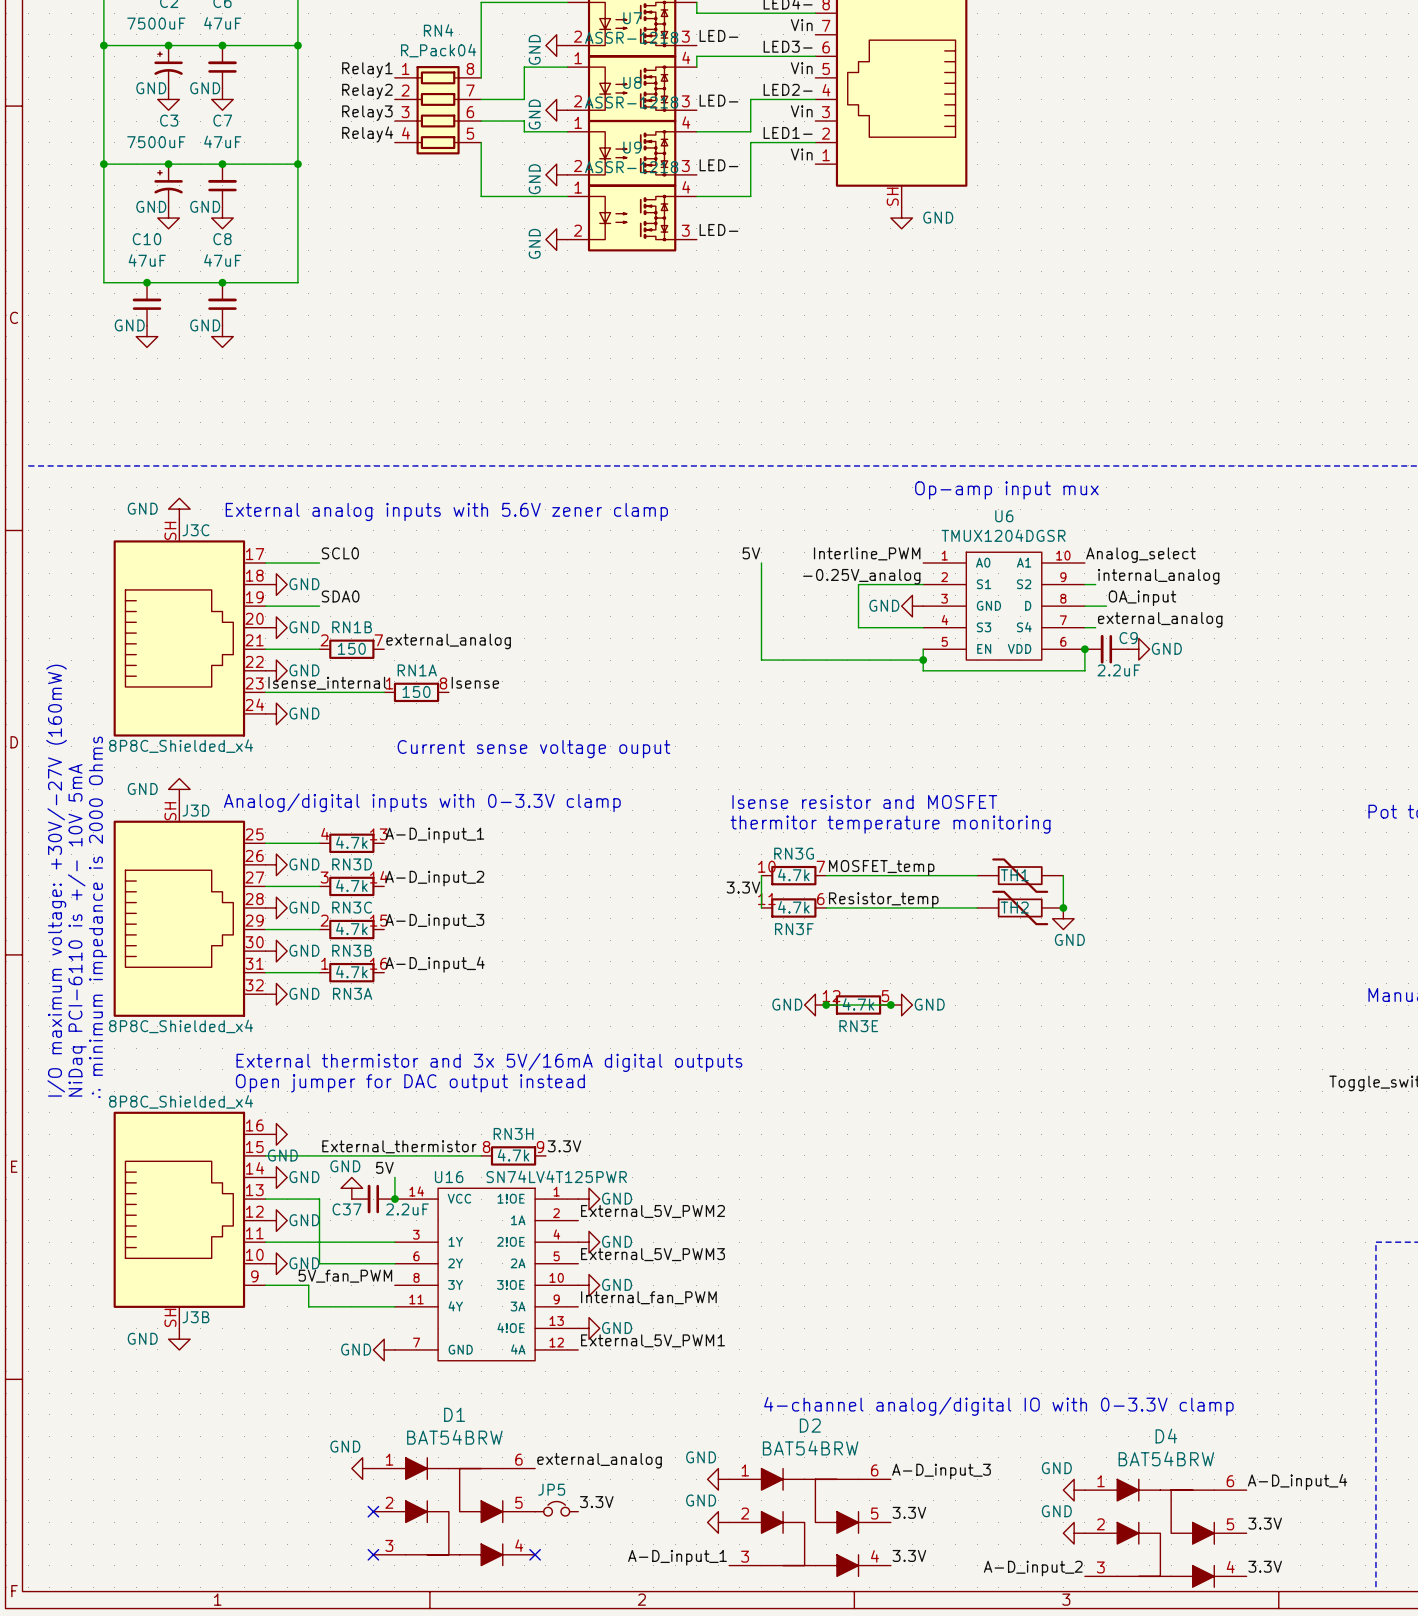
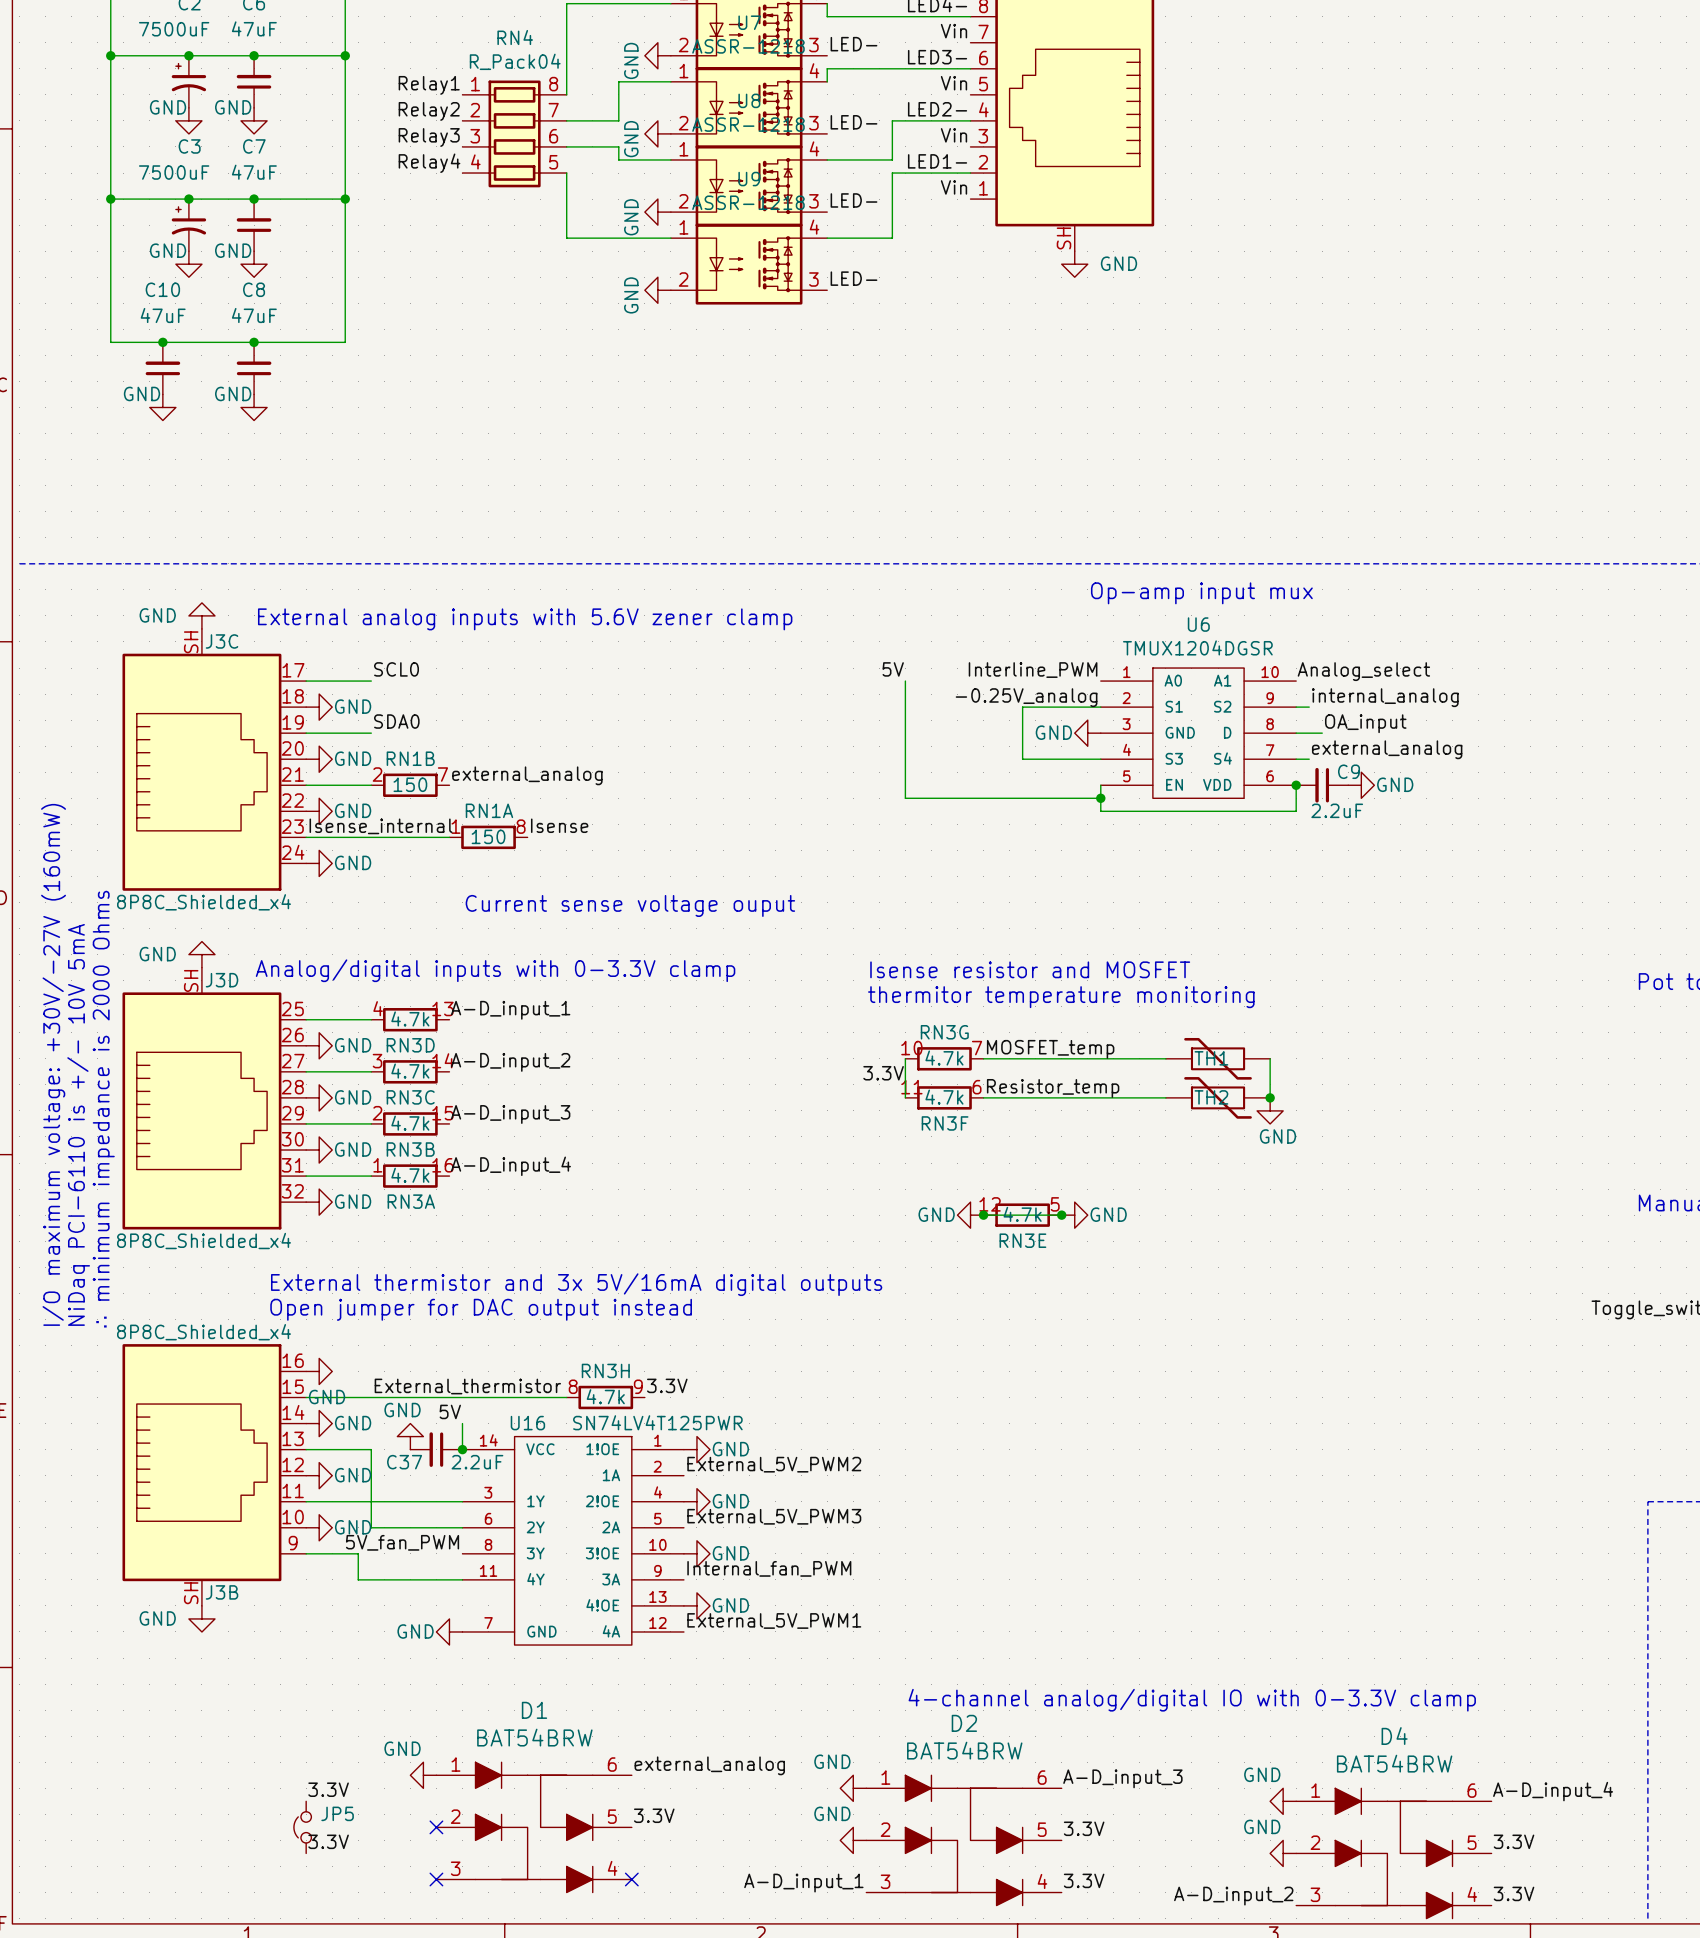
label: none -> 3.3V (328, 1789)
JP5 name position: JP5 (551, 1489) -> JP5 (337, 1813)
label position: 3.3V (596, 1502) -> 3.3V (654, 1815)
JP5 rotation: 0° (556, 1508) -> 90° counterclockwise (302, 1827)
JP5 position: (556, 1508) -> (302, 1827)
label: none -> 3.3V (328, 1841)

